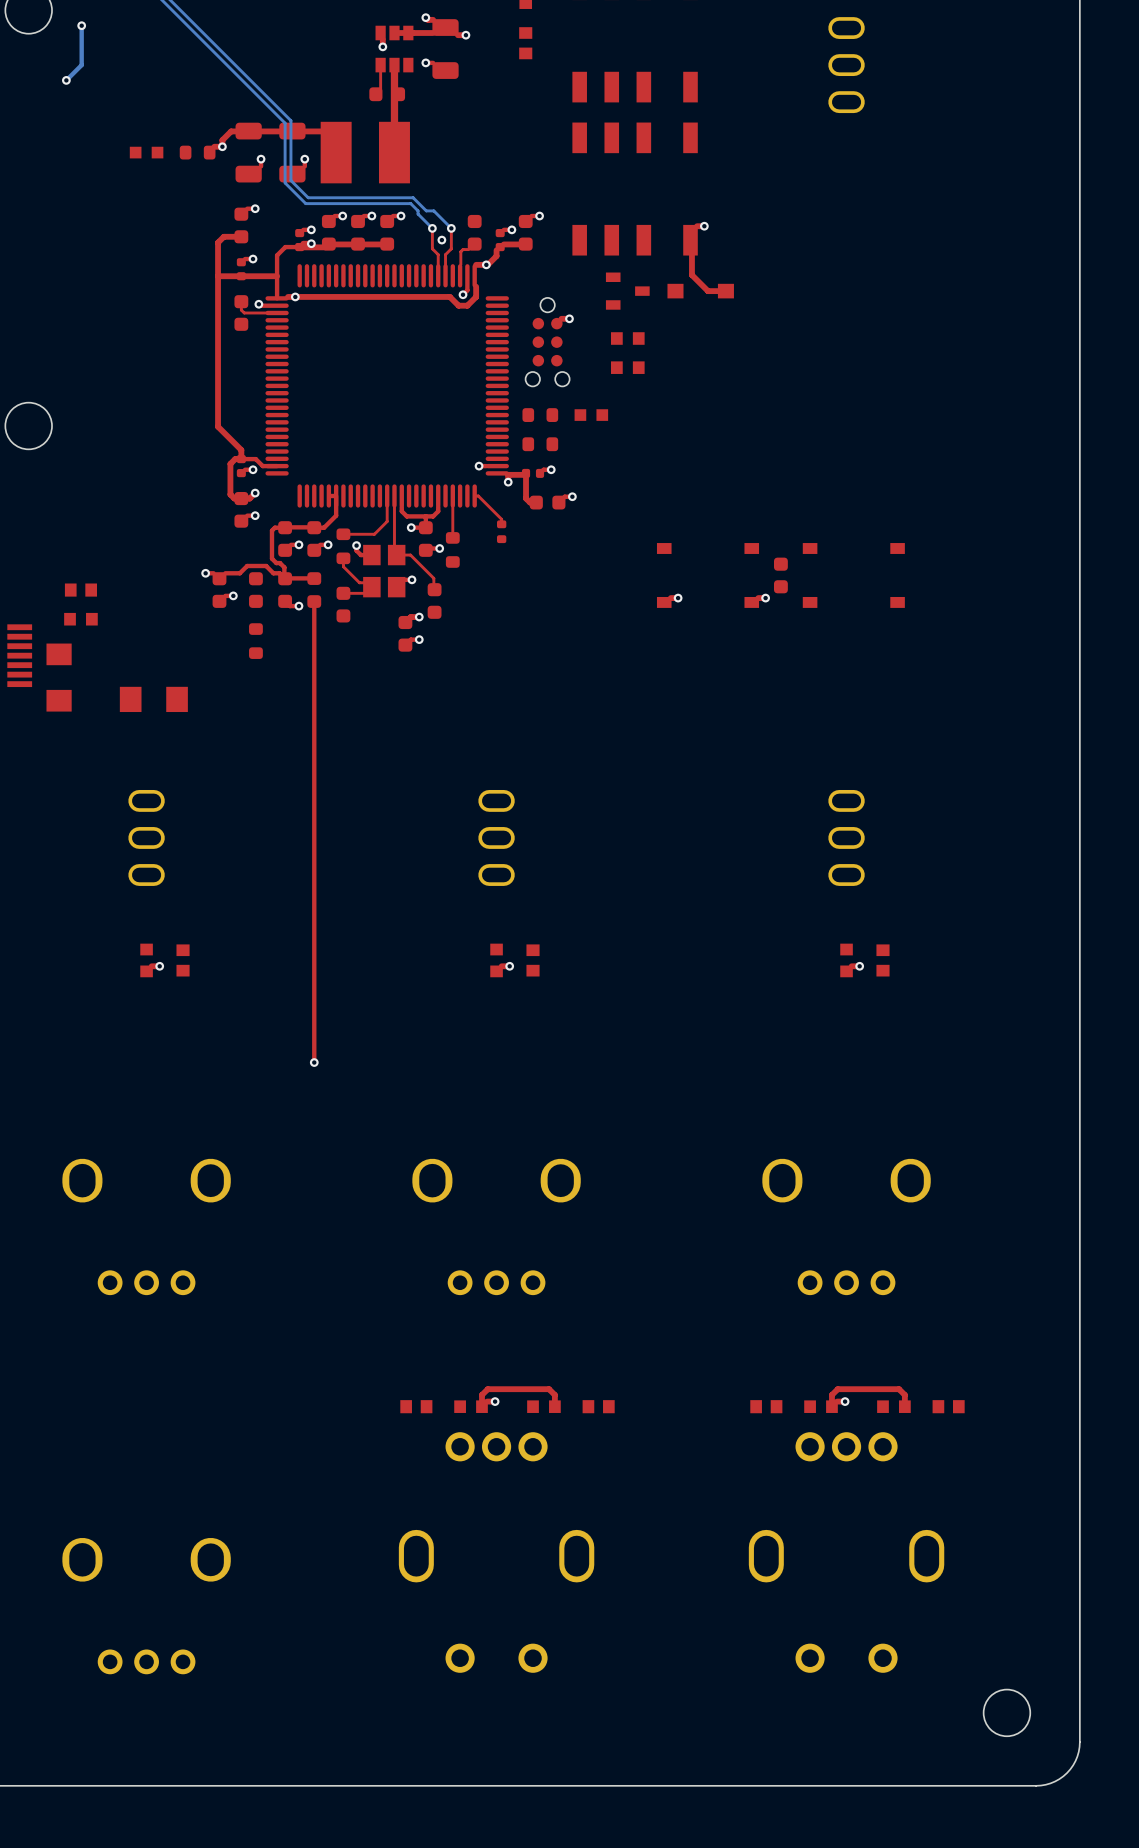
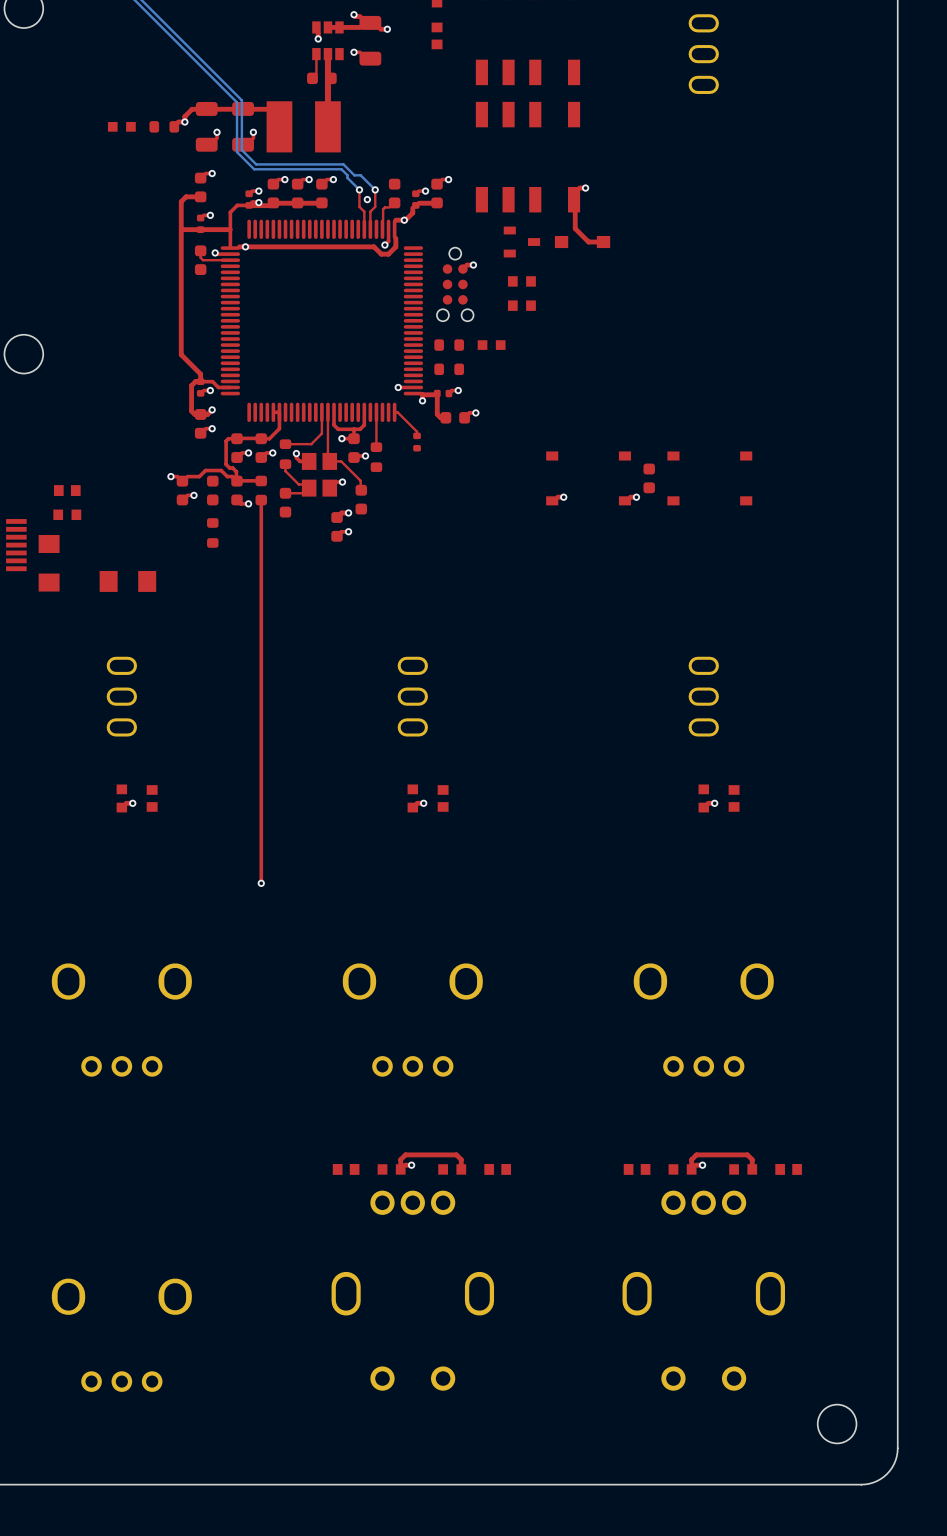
bottom track: (81, 25) (81, 65) (66, 80) -> none
via: (81, 25) -> none
via: (66, 80) -> none

